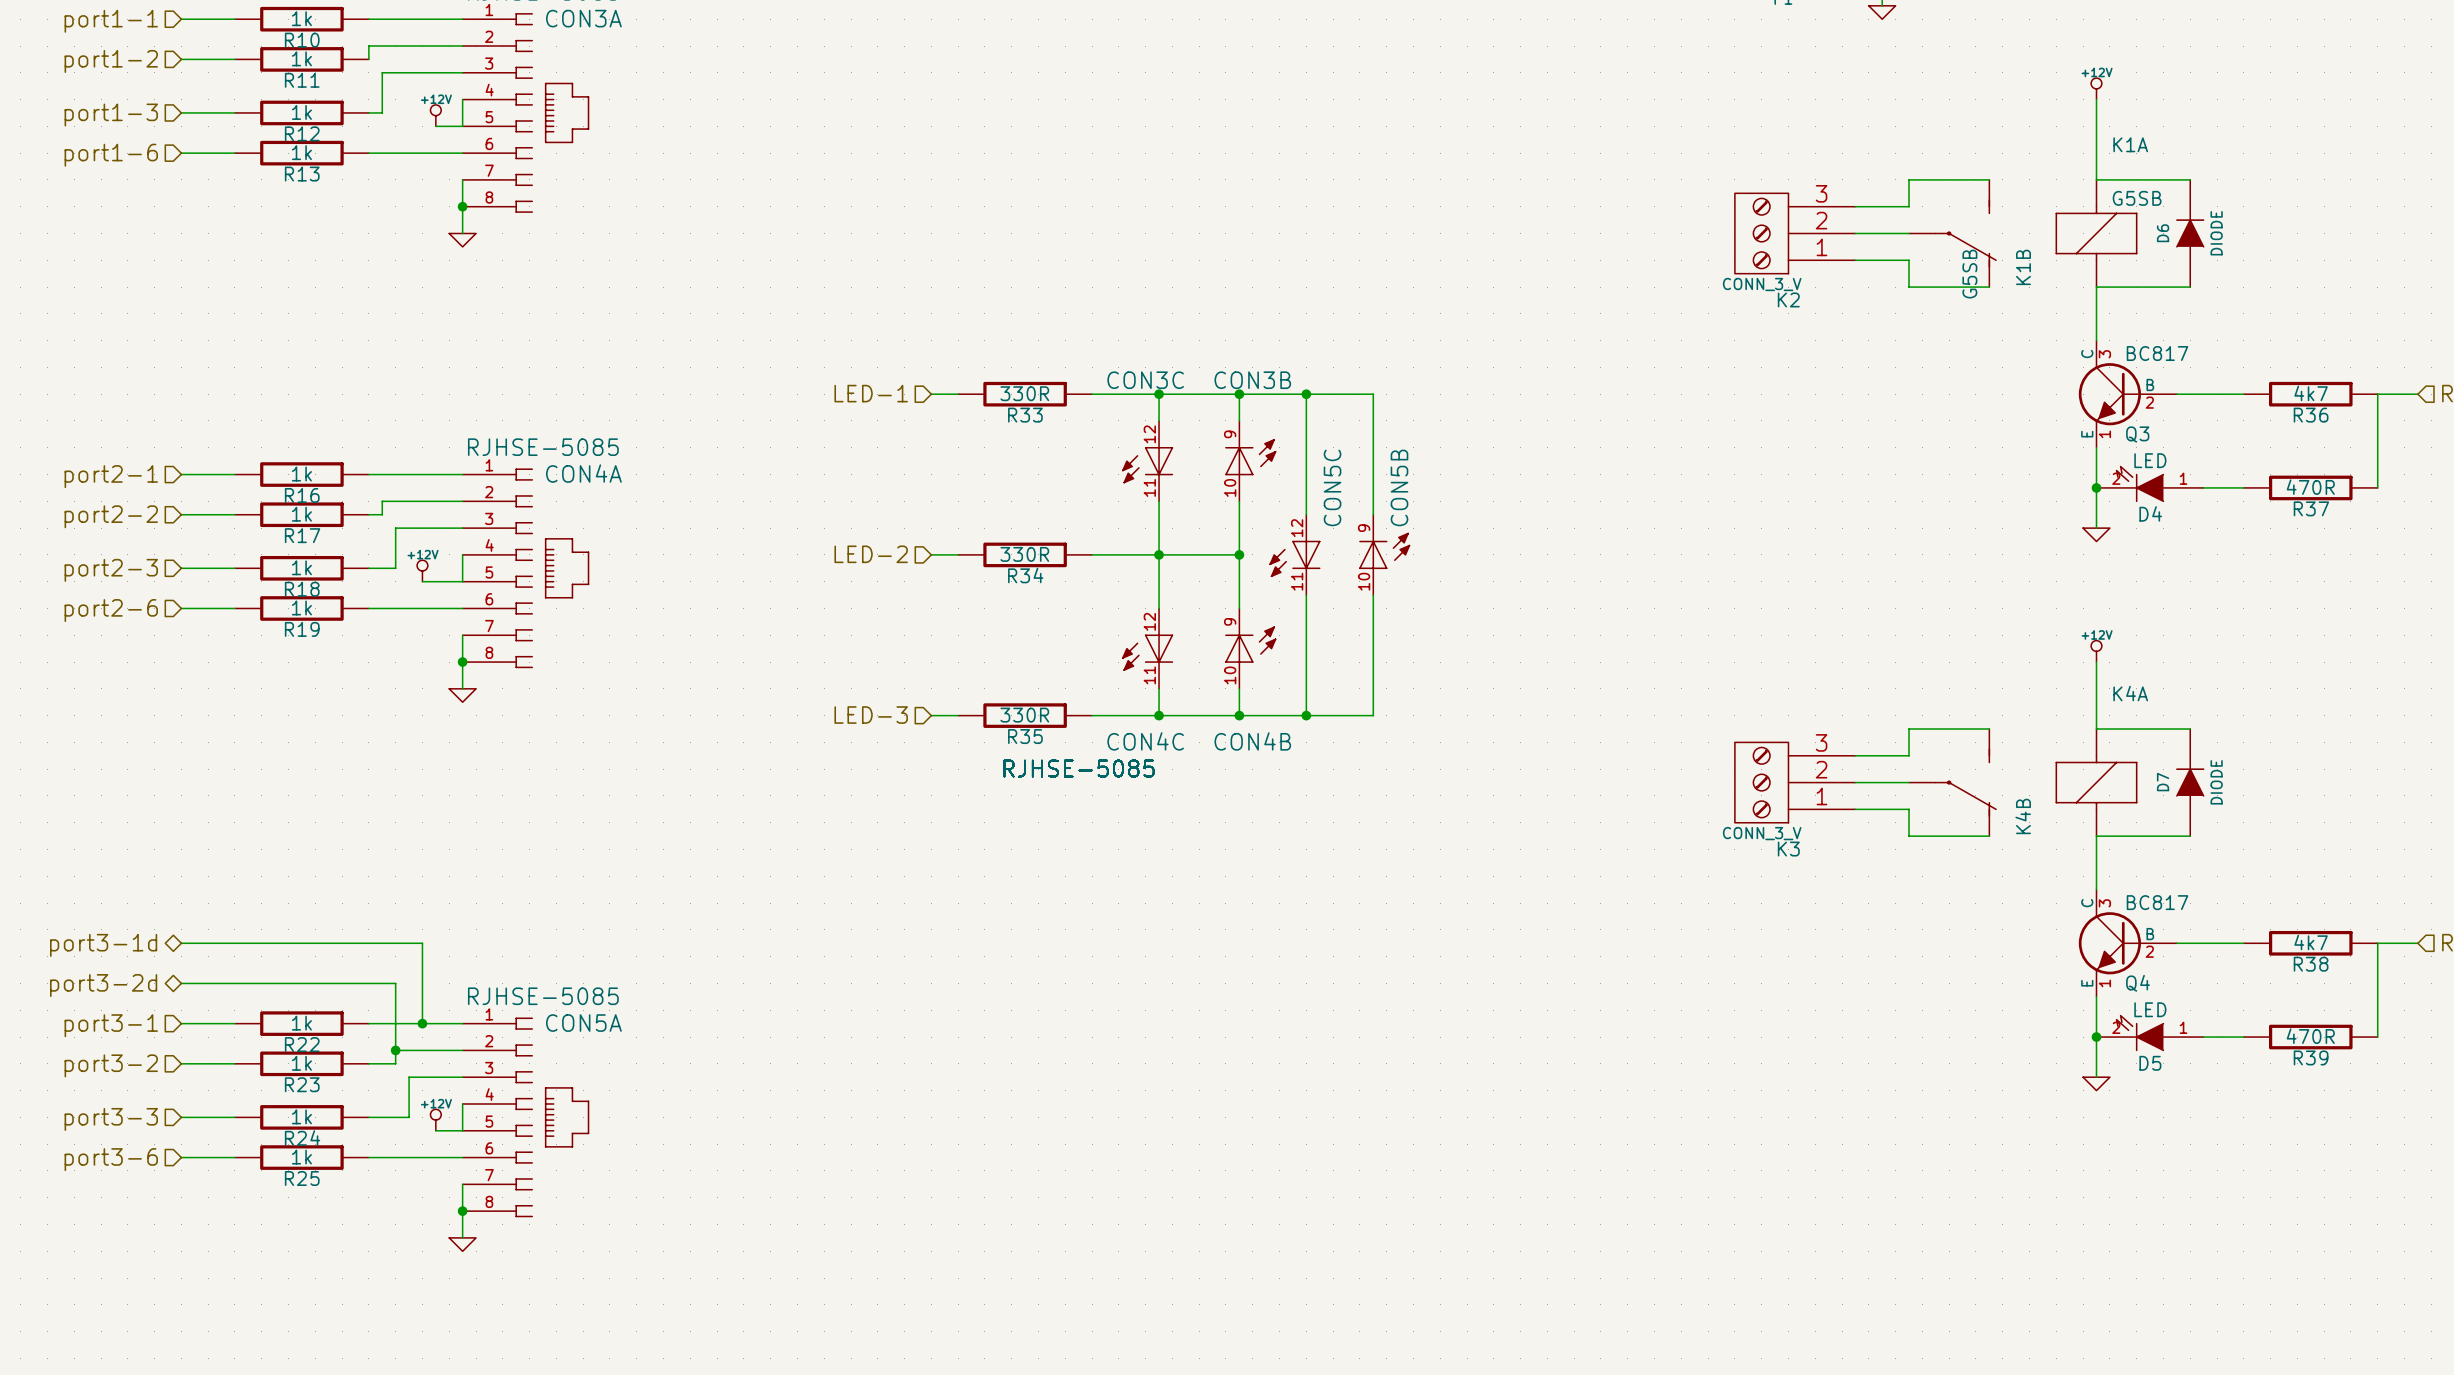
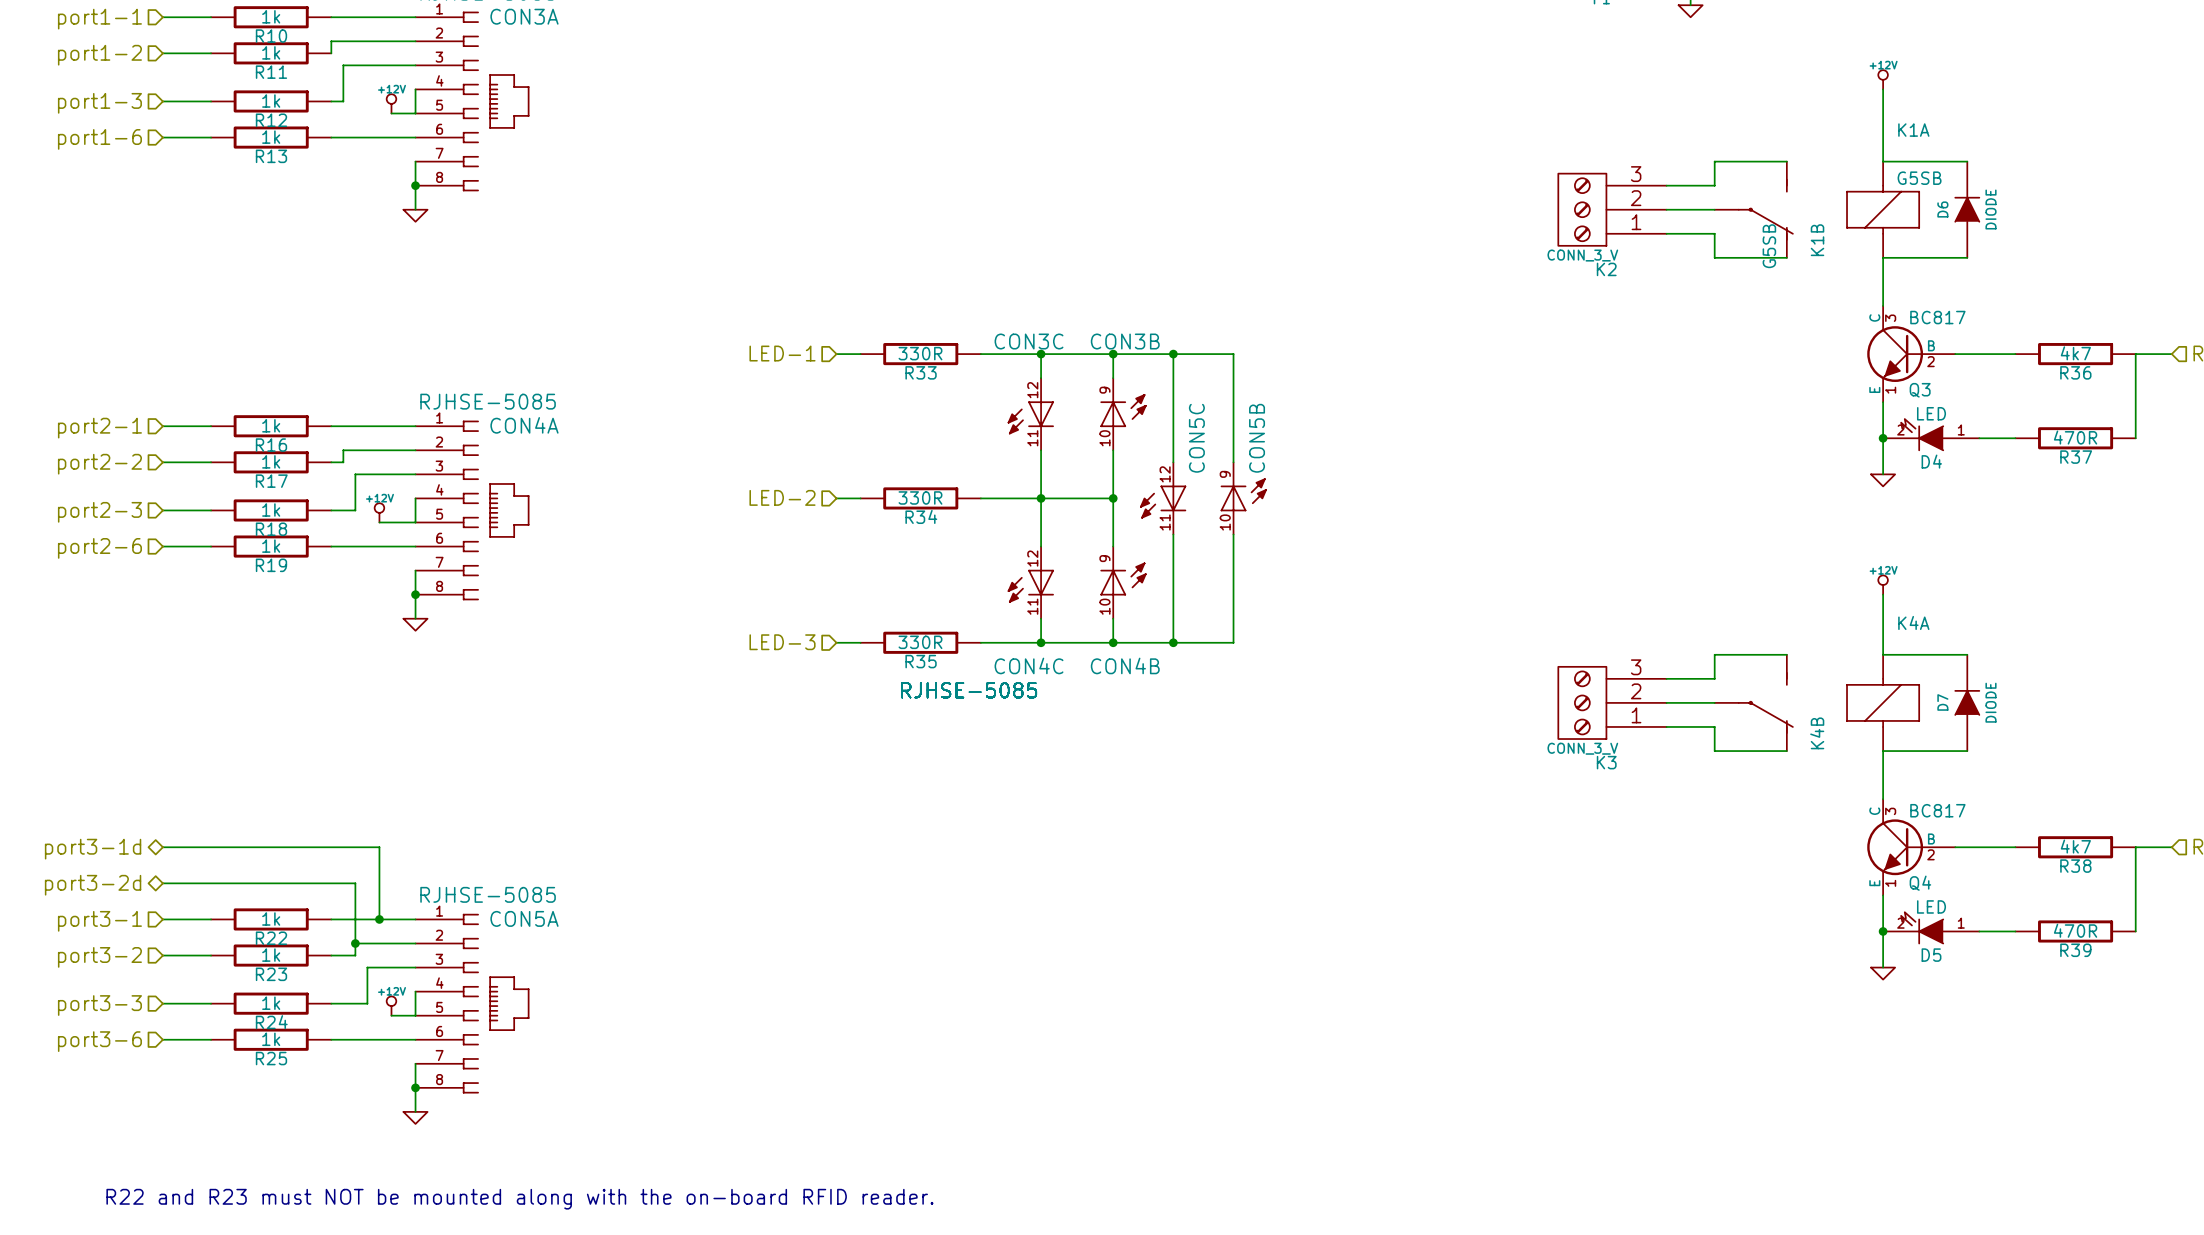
text: none -> R22 and R23 must NOT be mounted along with the on-board RFID reader. (519, 1199)

